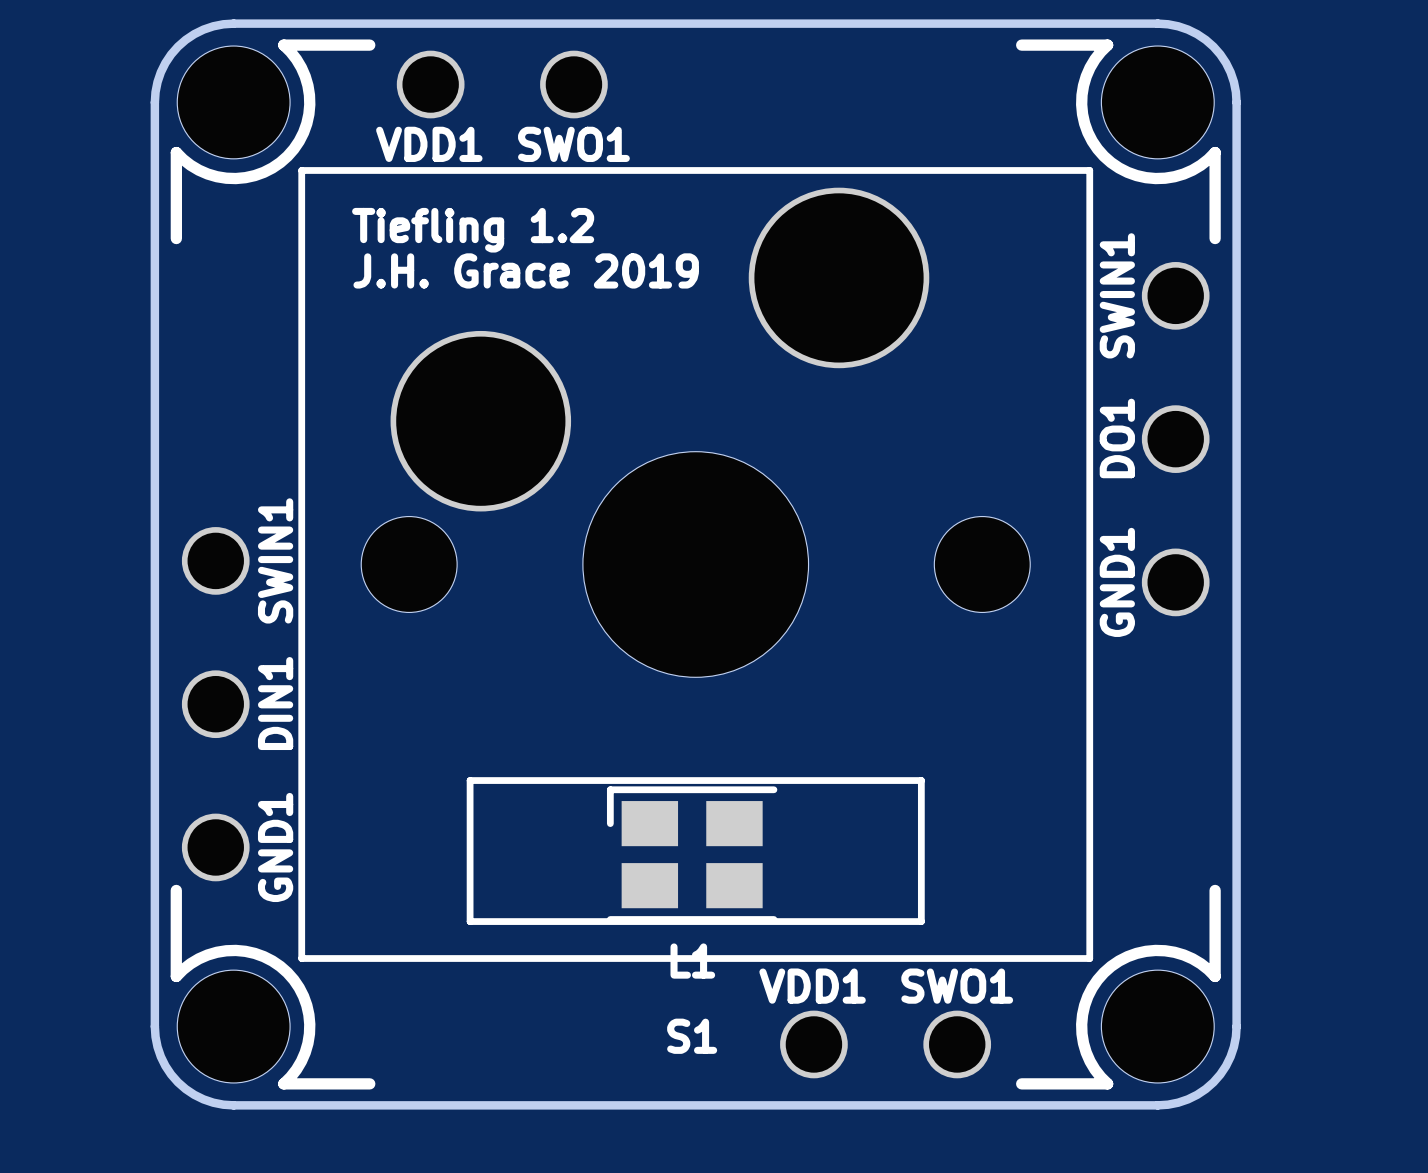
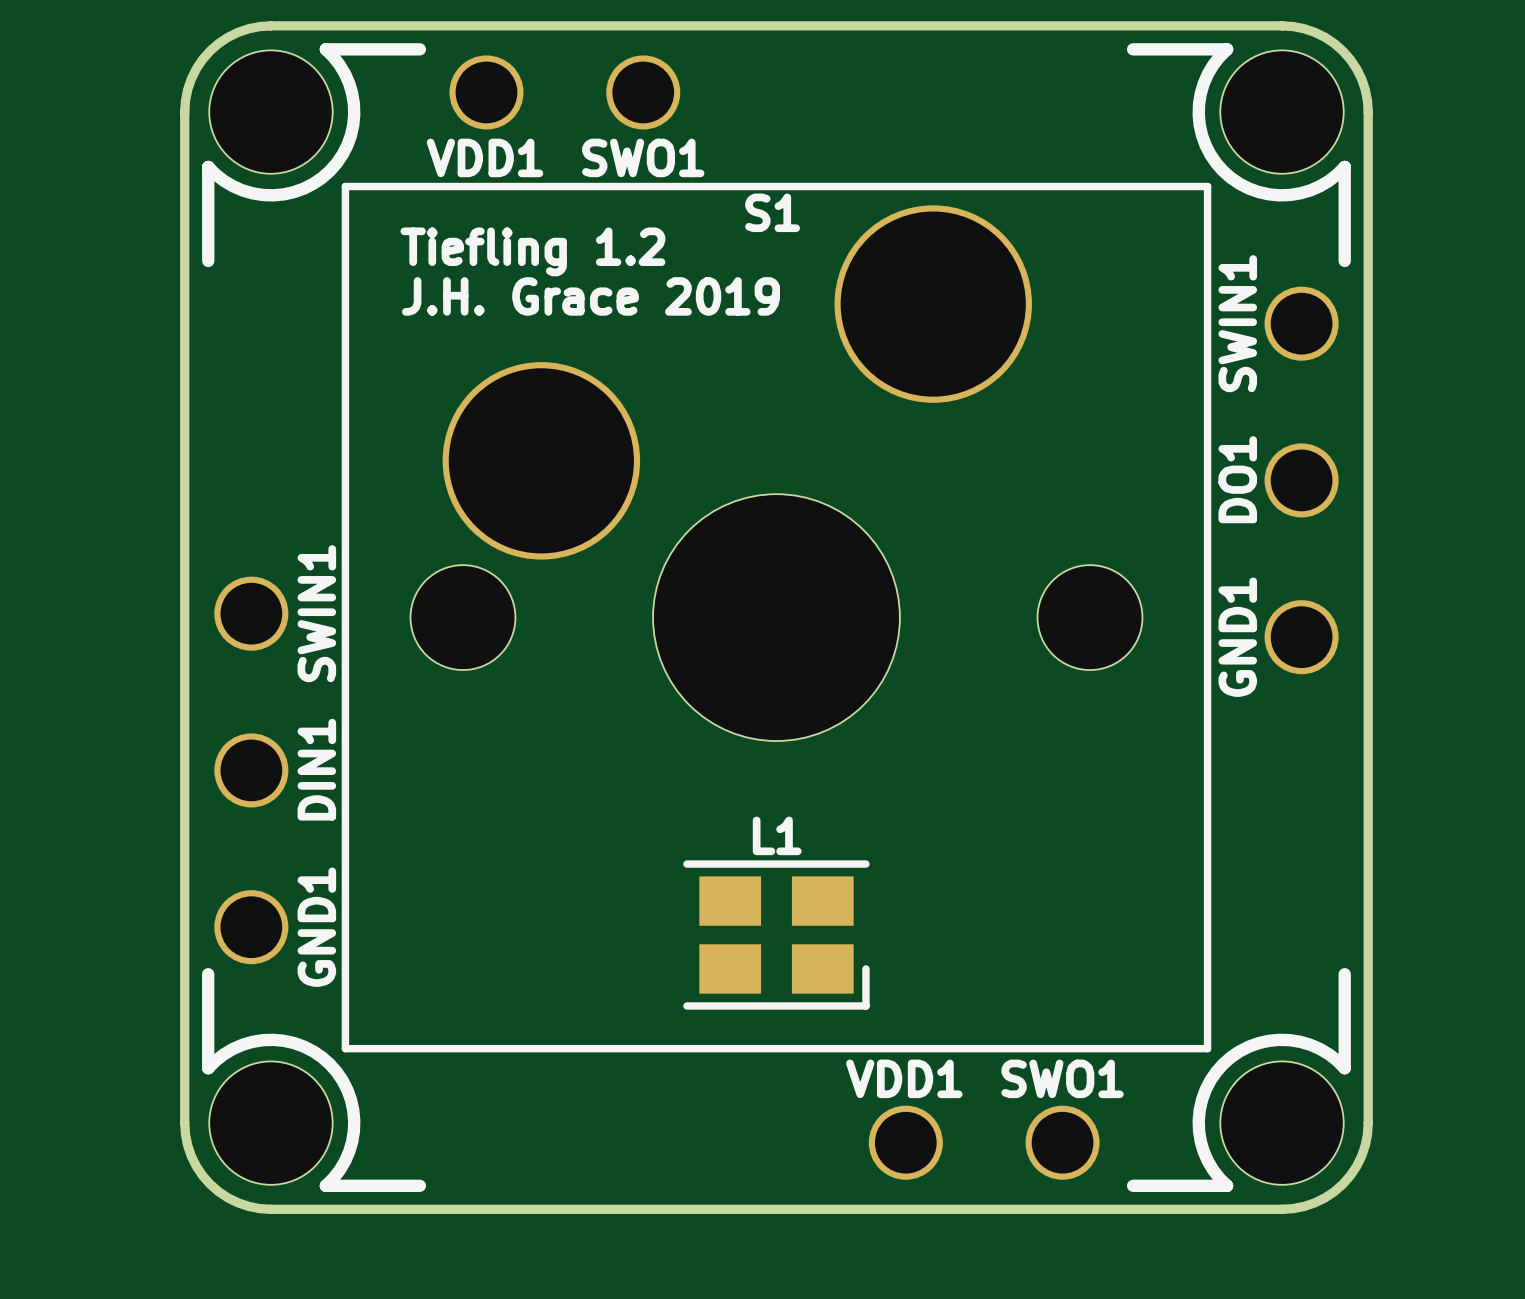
S1 footprint: [298, 167, 1094, 962] -> [341, 182, 1212, 1053]
L1 rotation: 0° (692, 854) -> 180° (776, 935)
S1 name position: S1 (692, 1036) -> S1 (772, 212)

